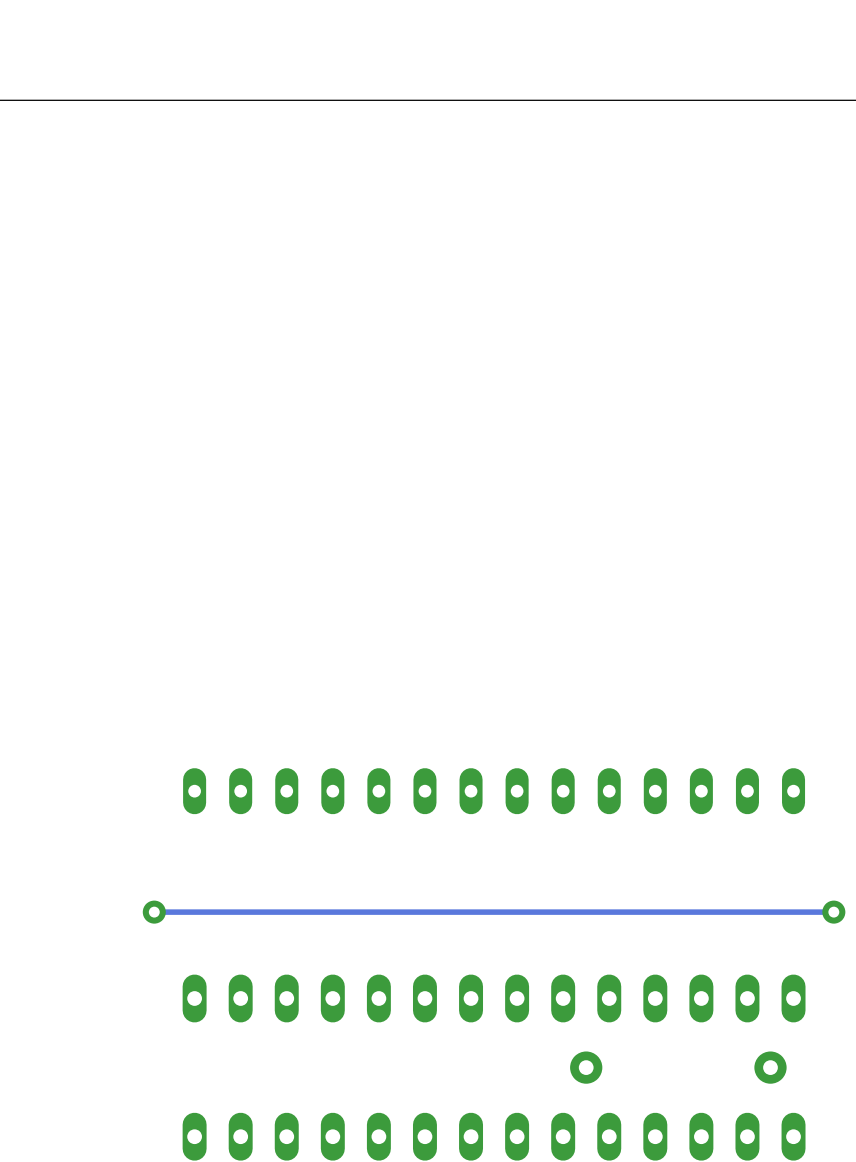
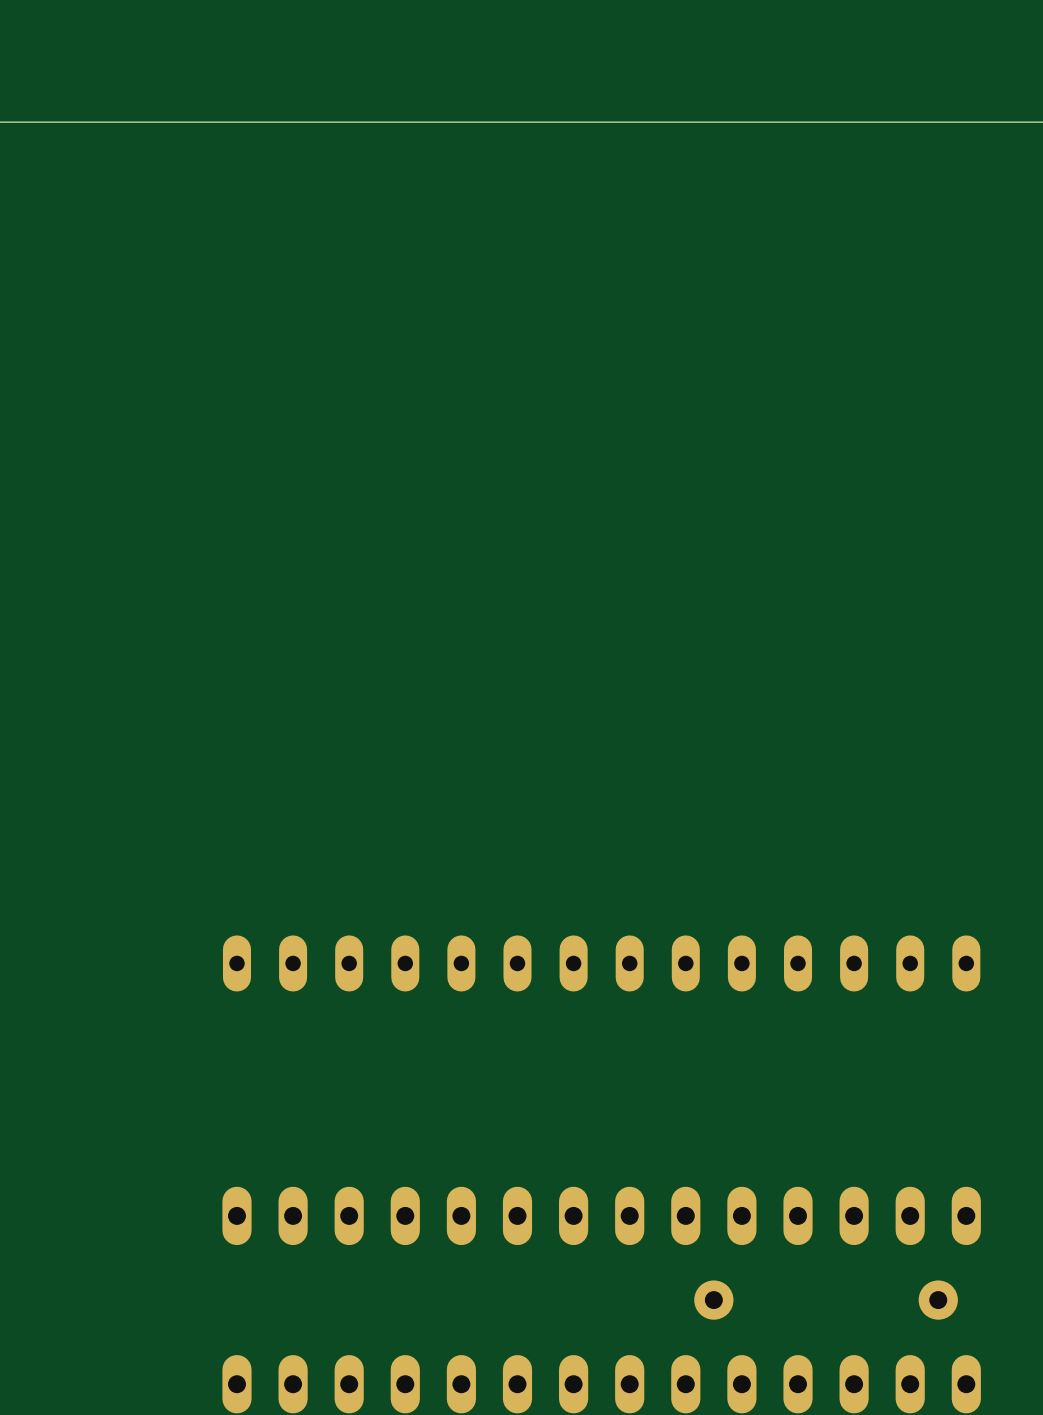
via: (154, 912) -> none
track: (833, 912) (154, 912) -> none
via: (833, 912) -> none

